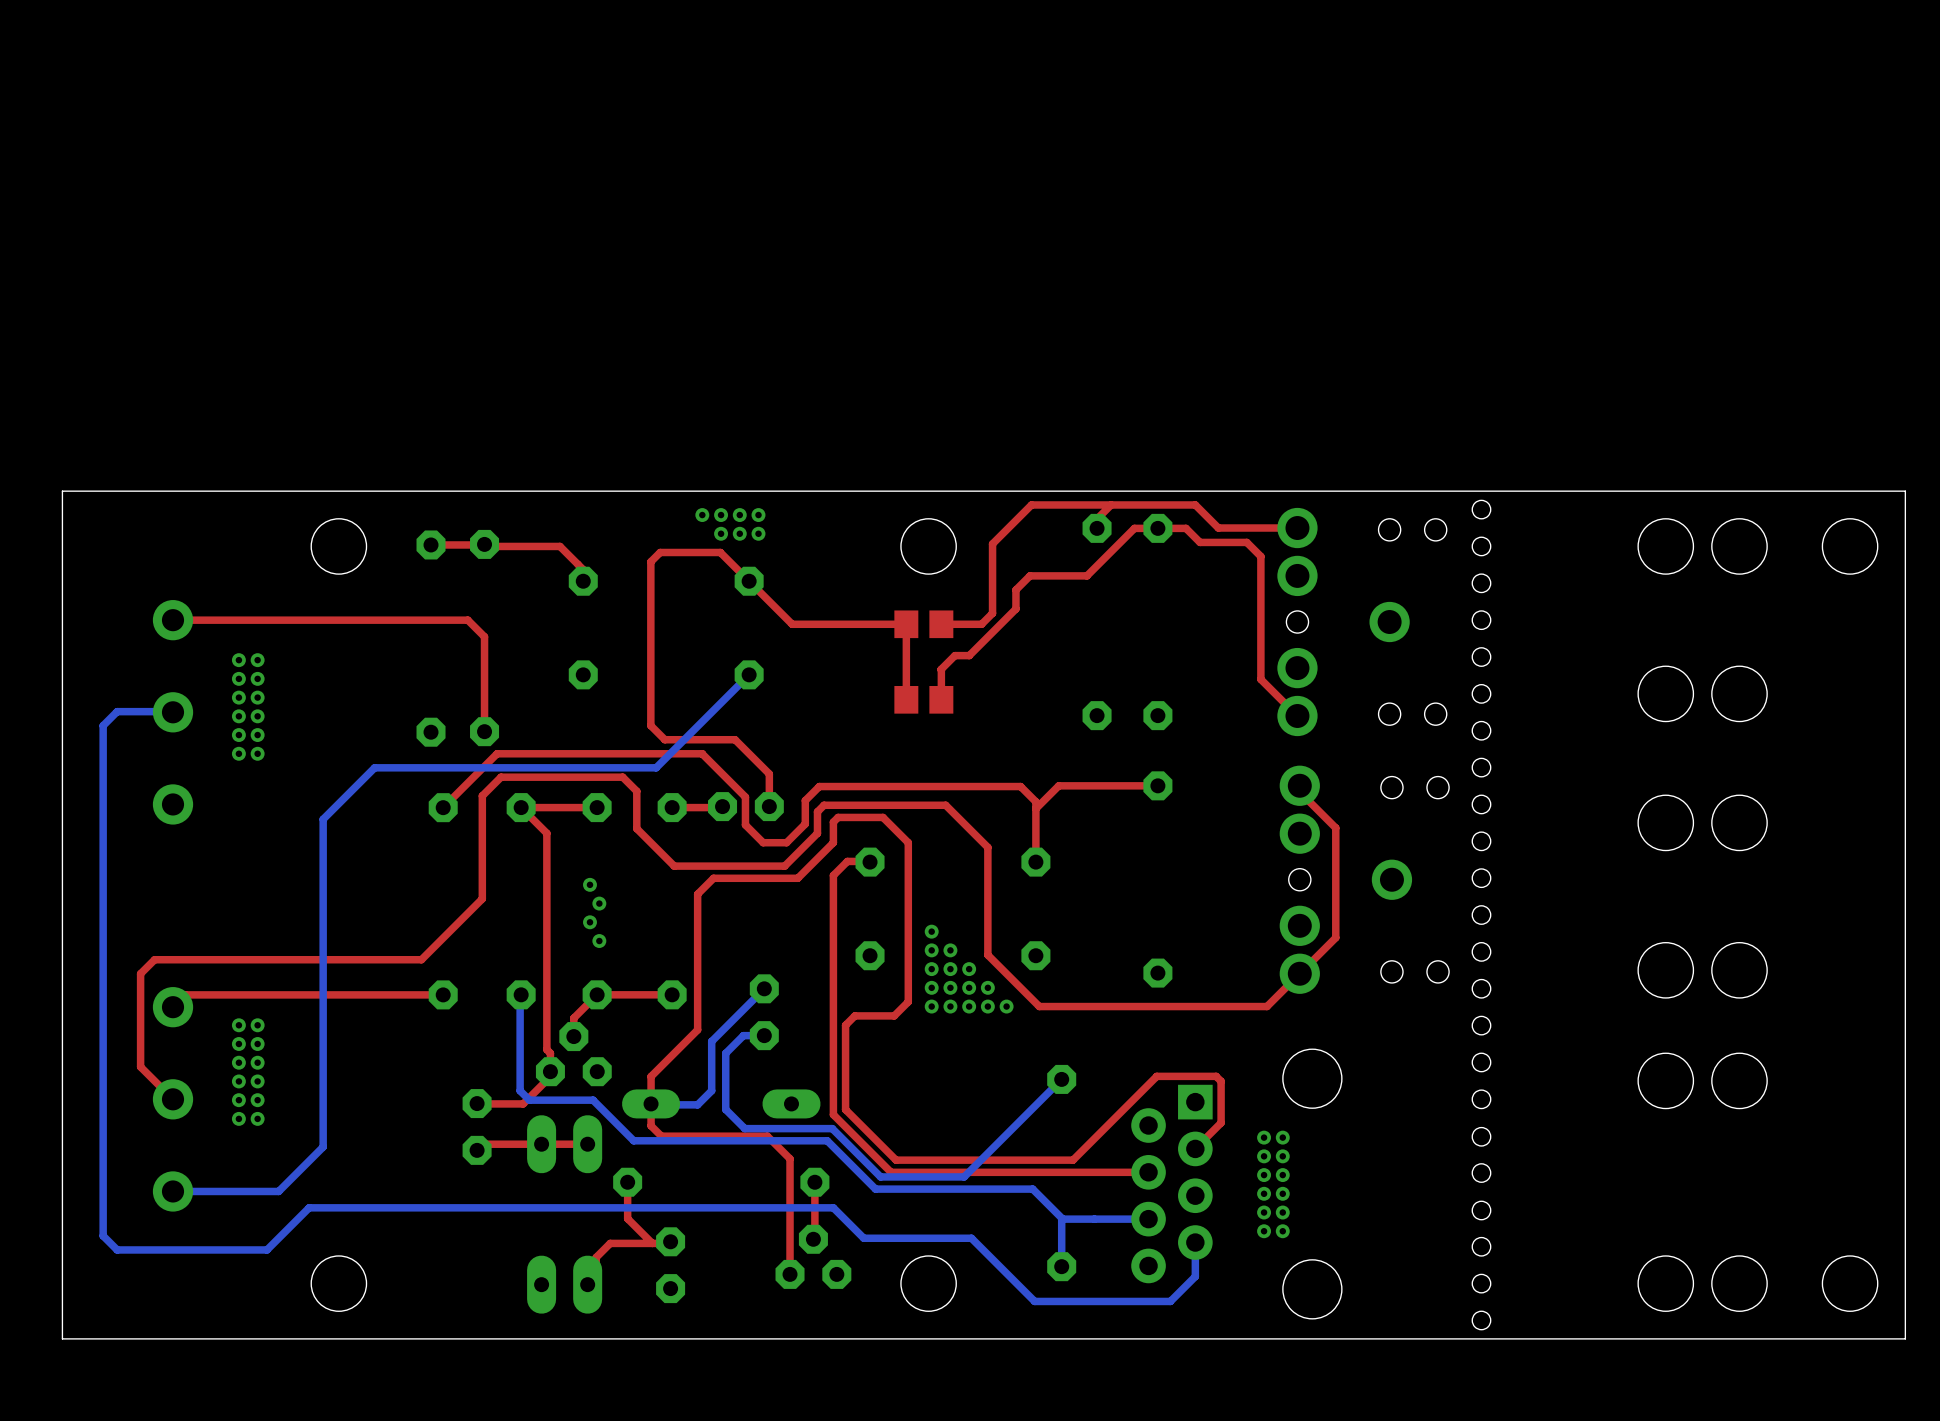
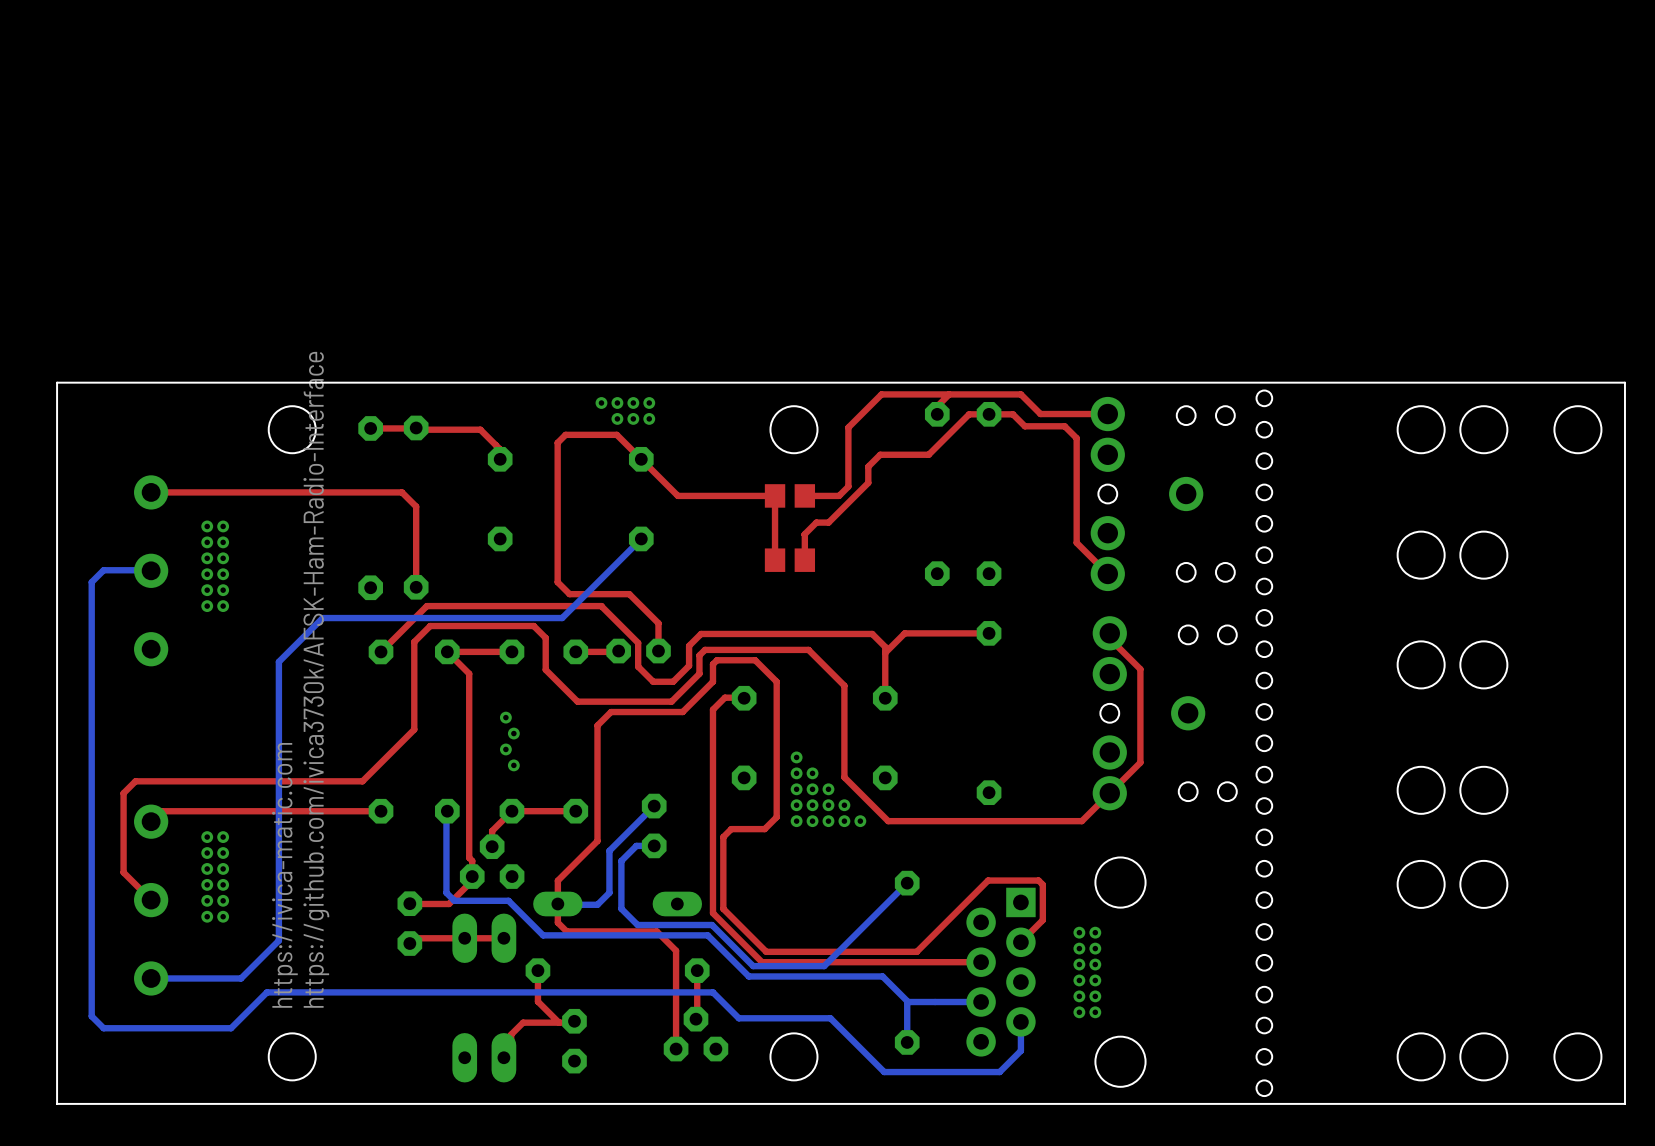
text: none -> https://github.com/ivica3730k/AFSK-Ham-Radio-Interface (316, 679)
text: none -> https://ivica-matic.com (284, 875)

